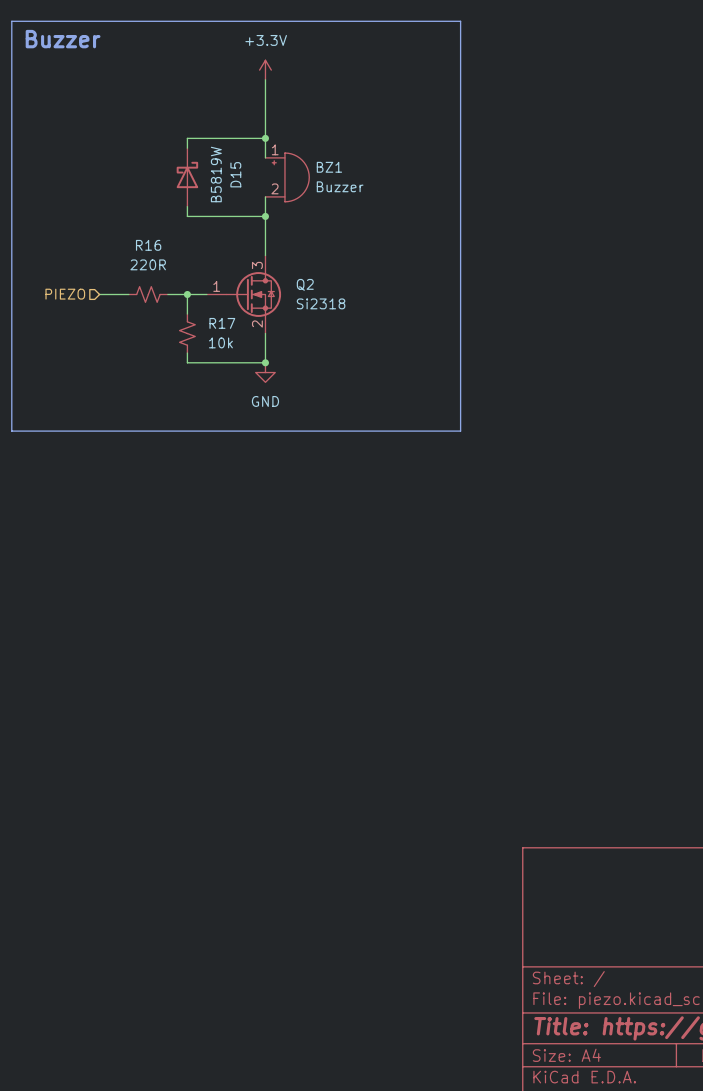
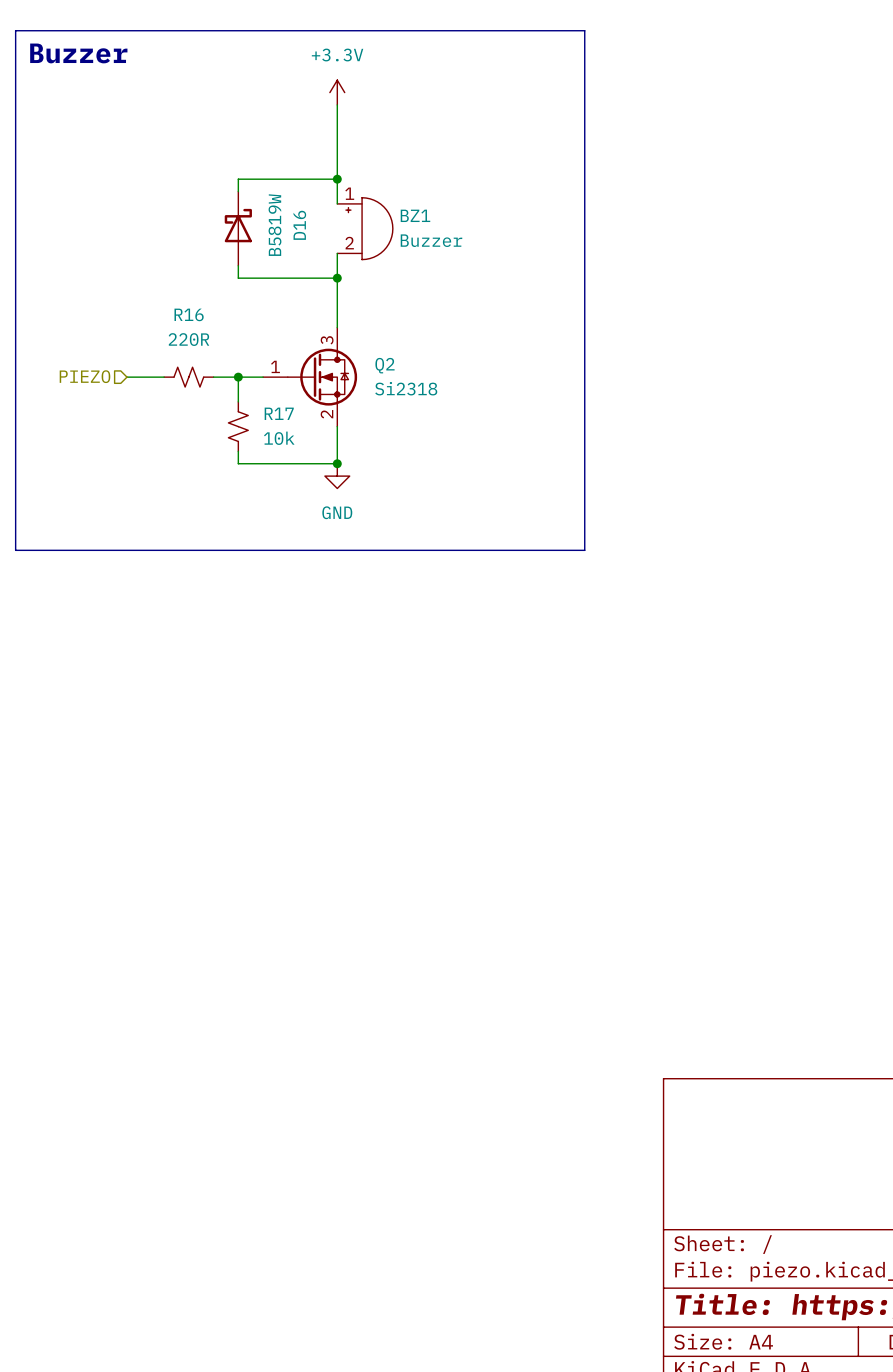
D15 name: D15 (235, 174) -> D16 (299, 225)

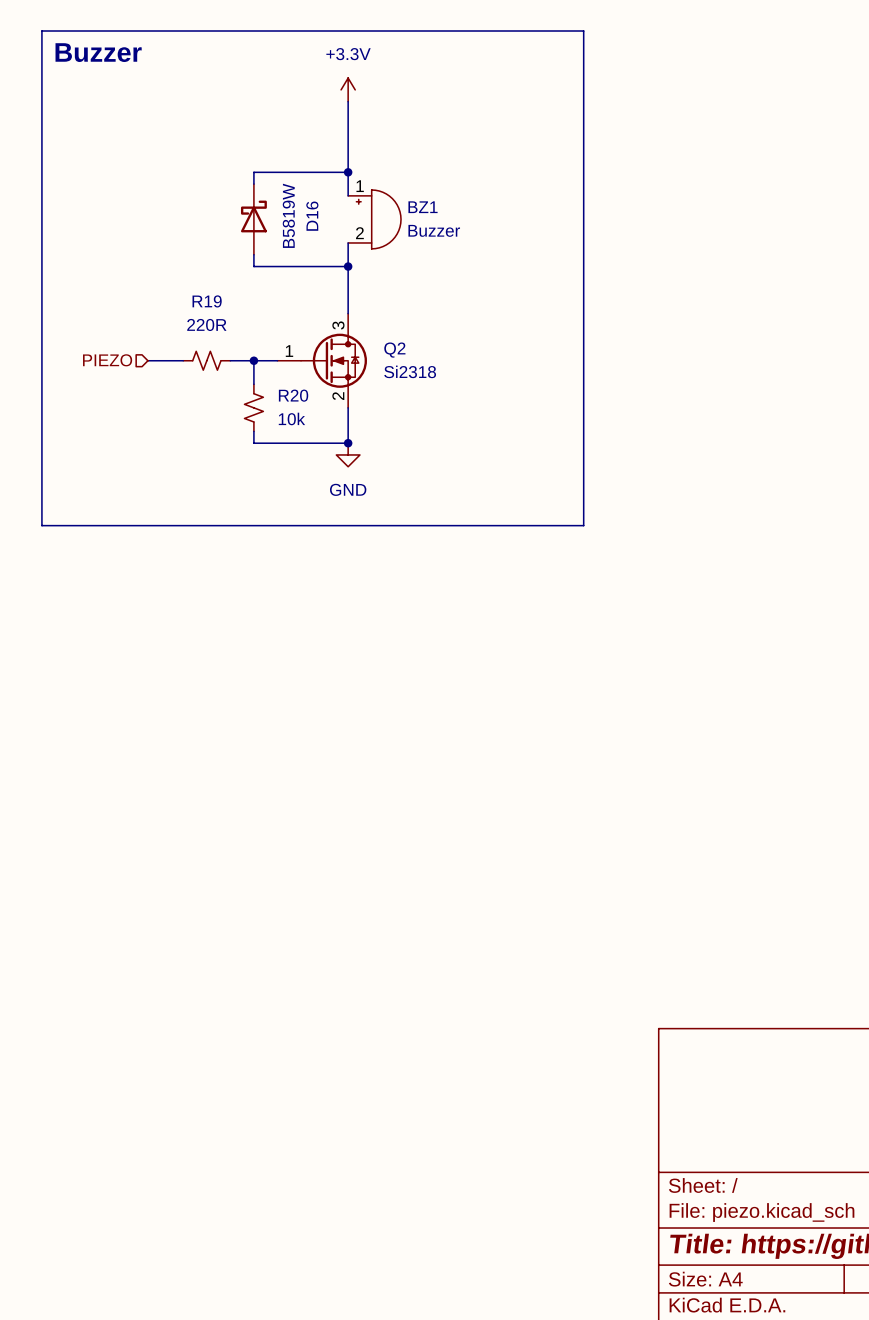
R16 name: R16 (189, 314) -> R19 (207, 301)
R17 name: R17 (279, 413) -> R20 (293, 395)

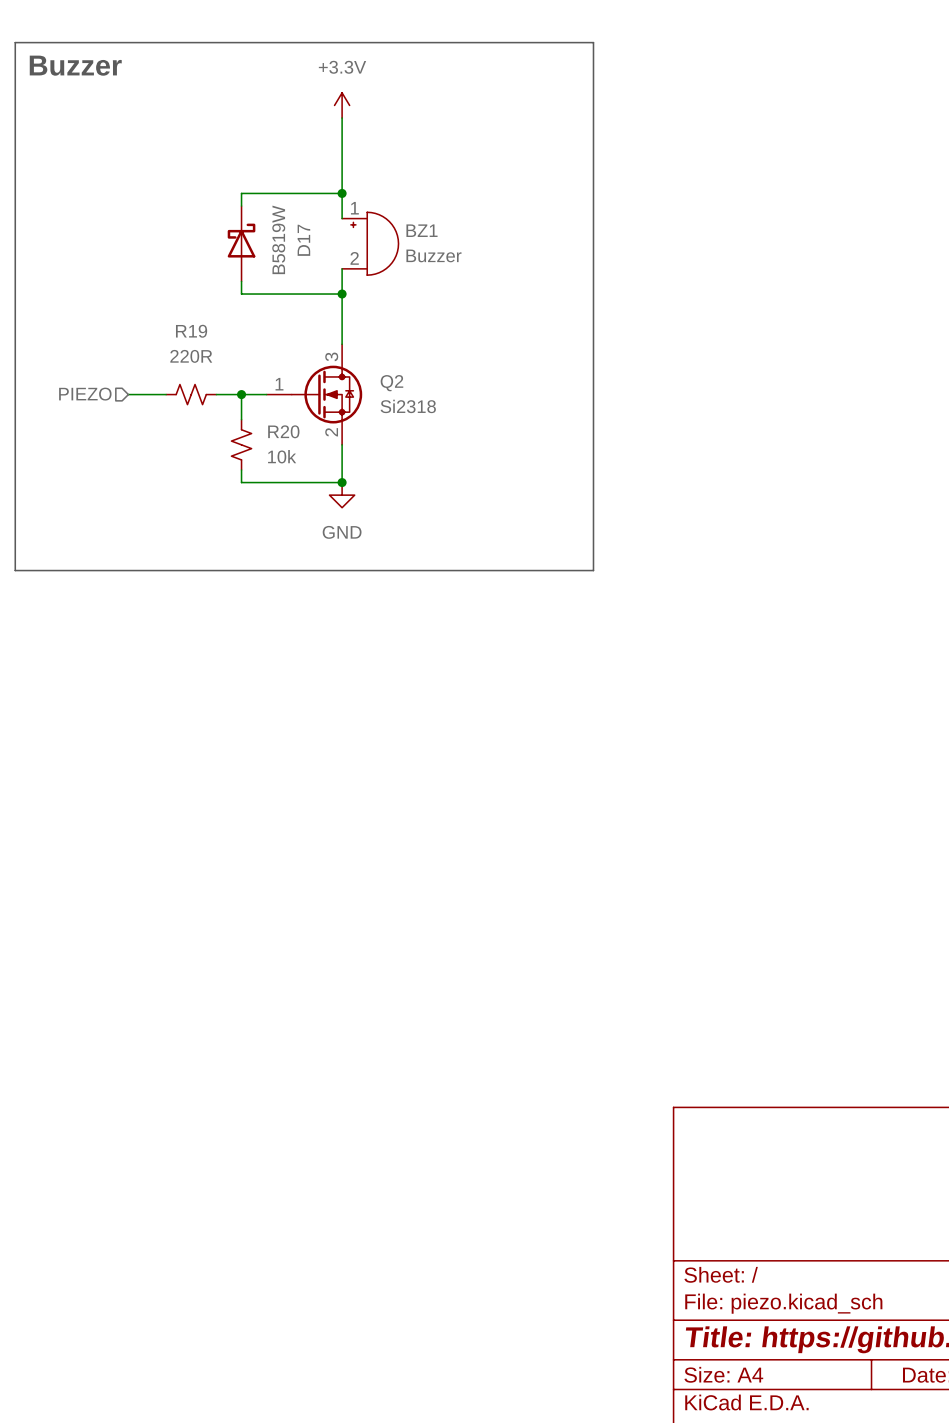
D16 name: D16 (312, 216) -> D17 (303, 240)

